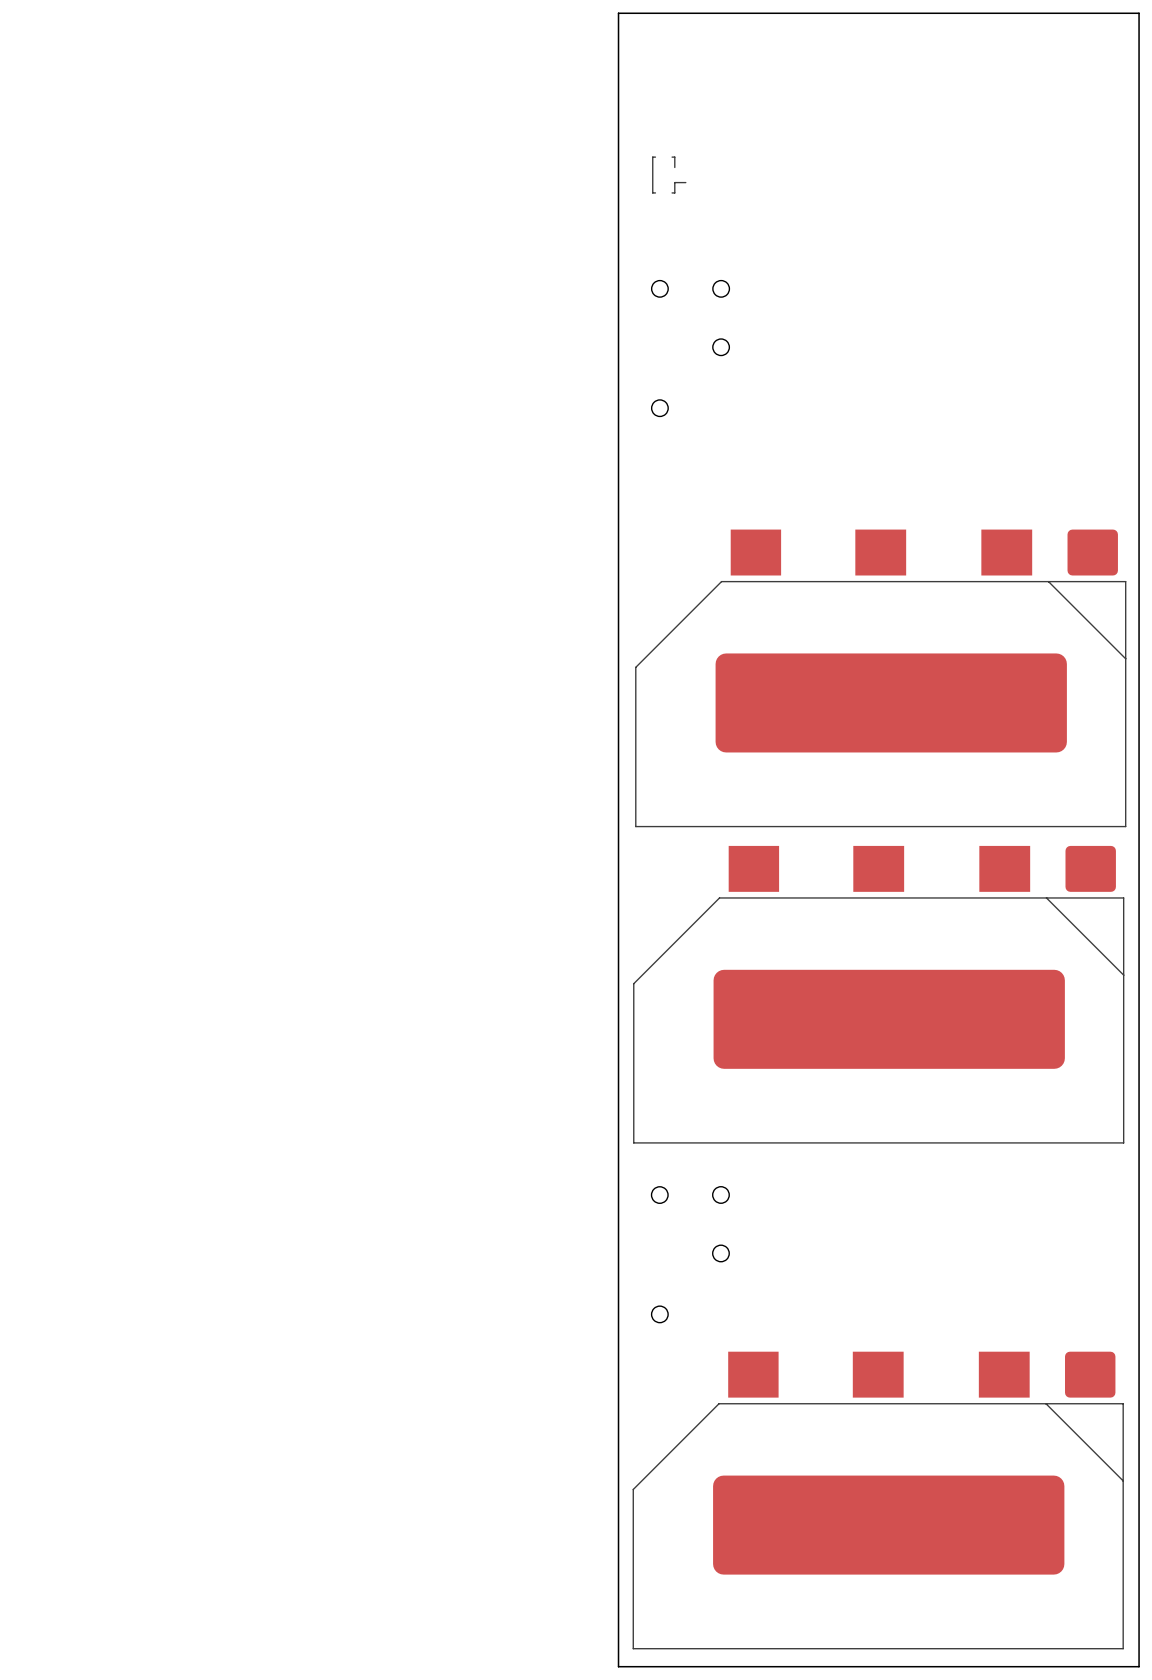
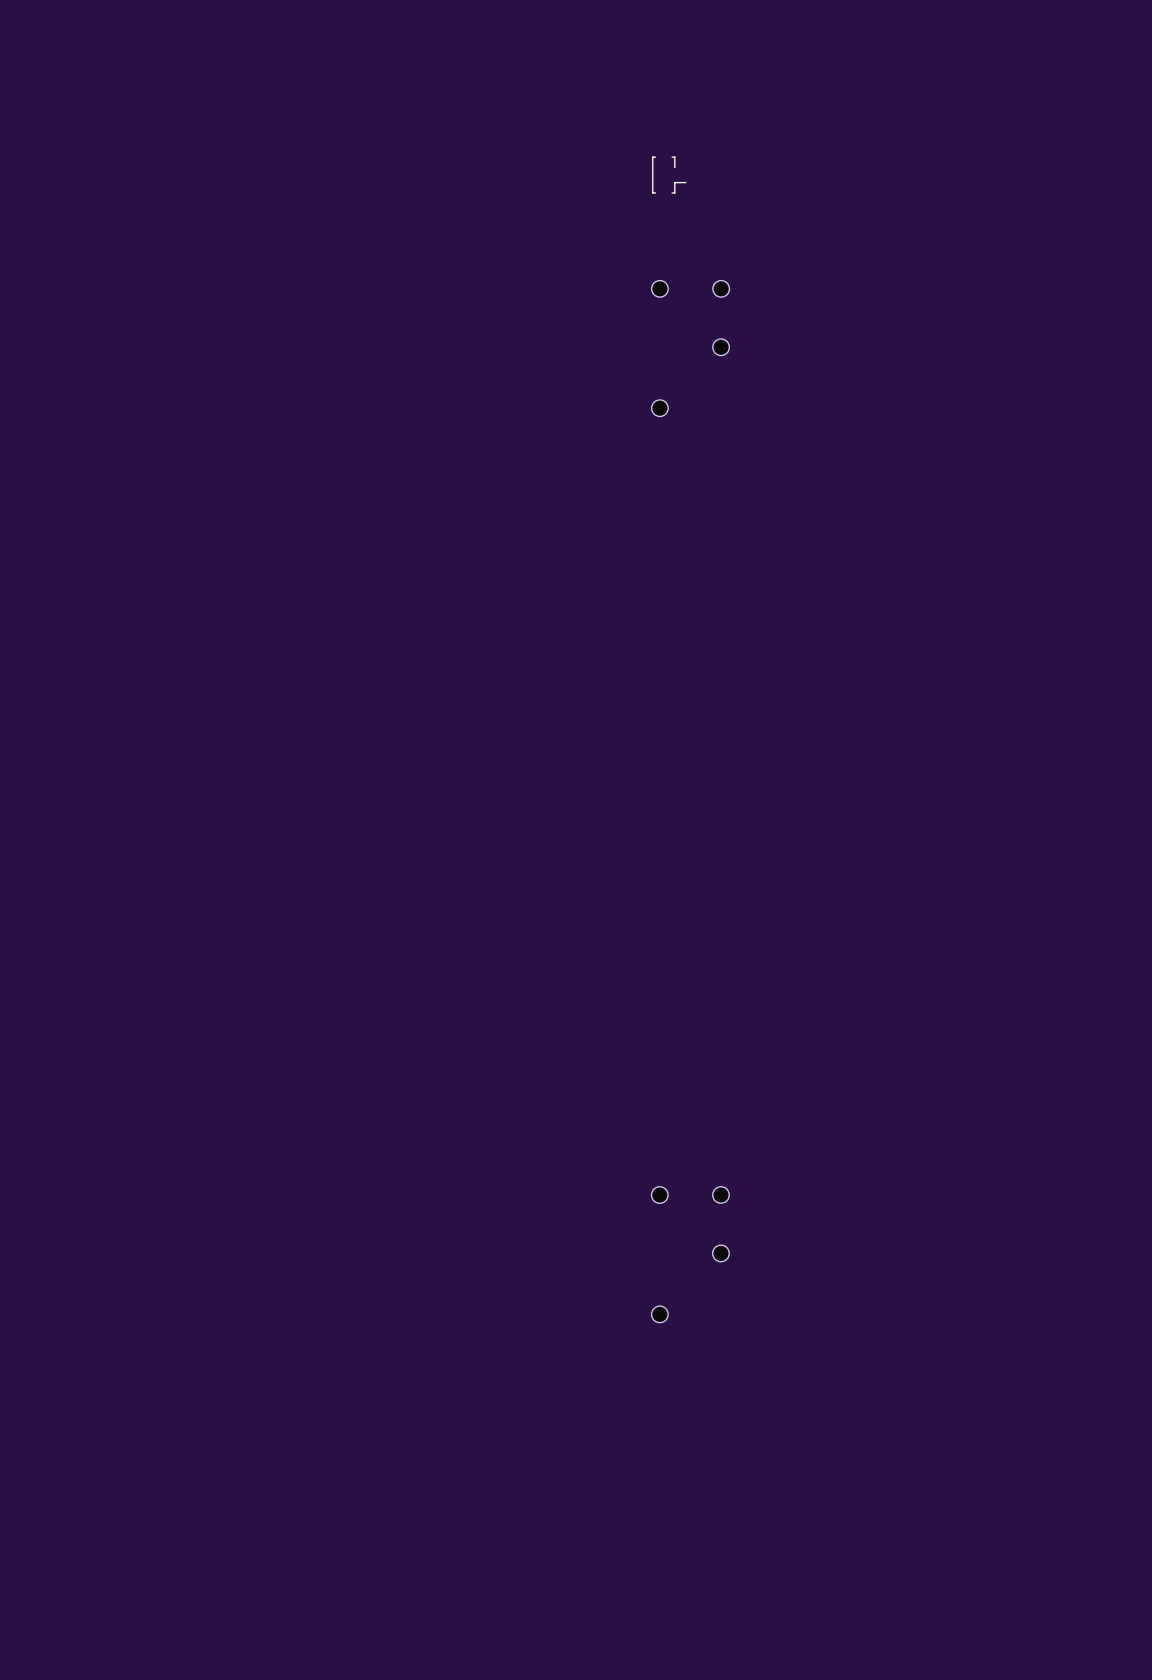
board edge: (618, 13) (1139, 13) (1139, 1666) (618, 1666) (618, 13) -> none
part: (880, 678) -> none
part: (878, 994) -> none
part: (878, 1500) -> none

